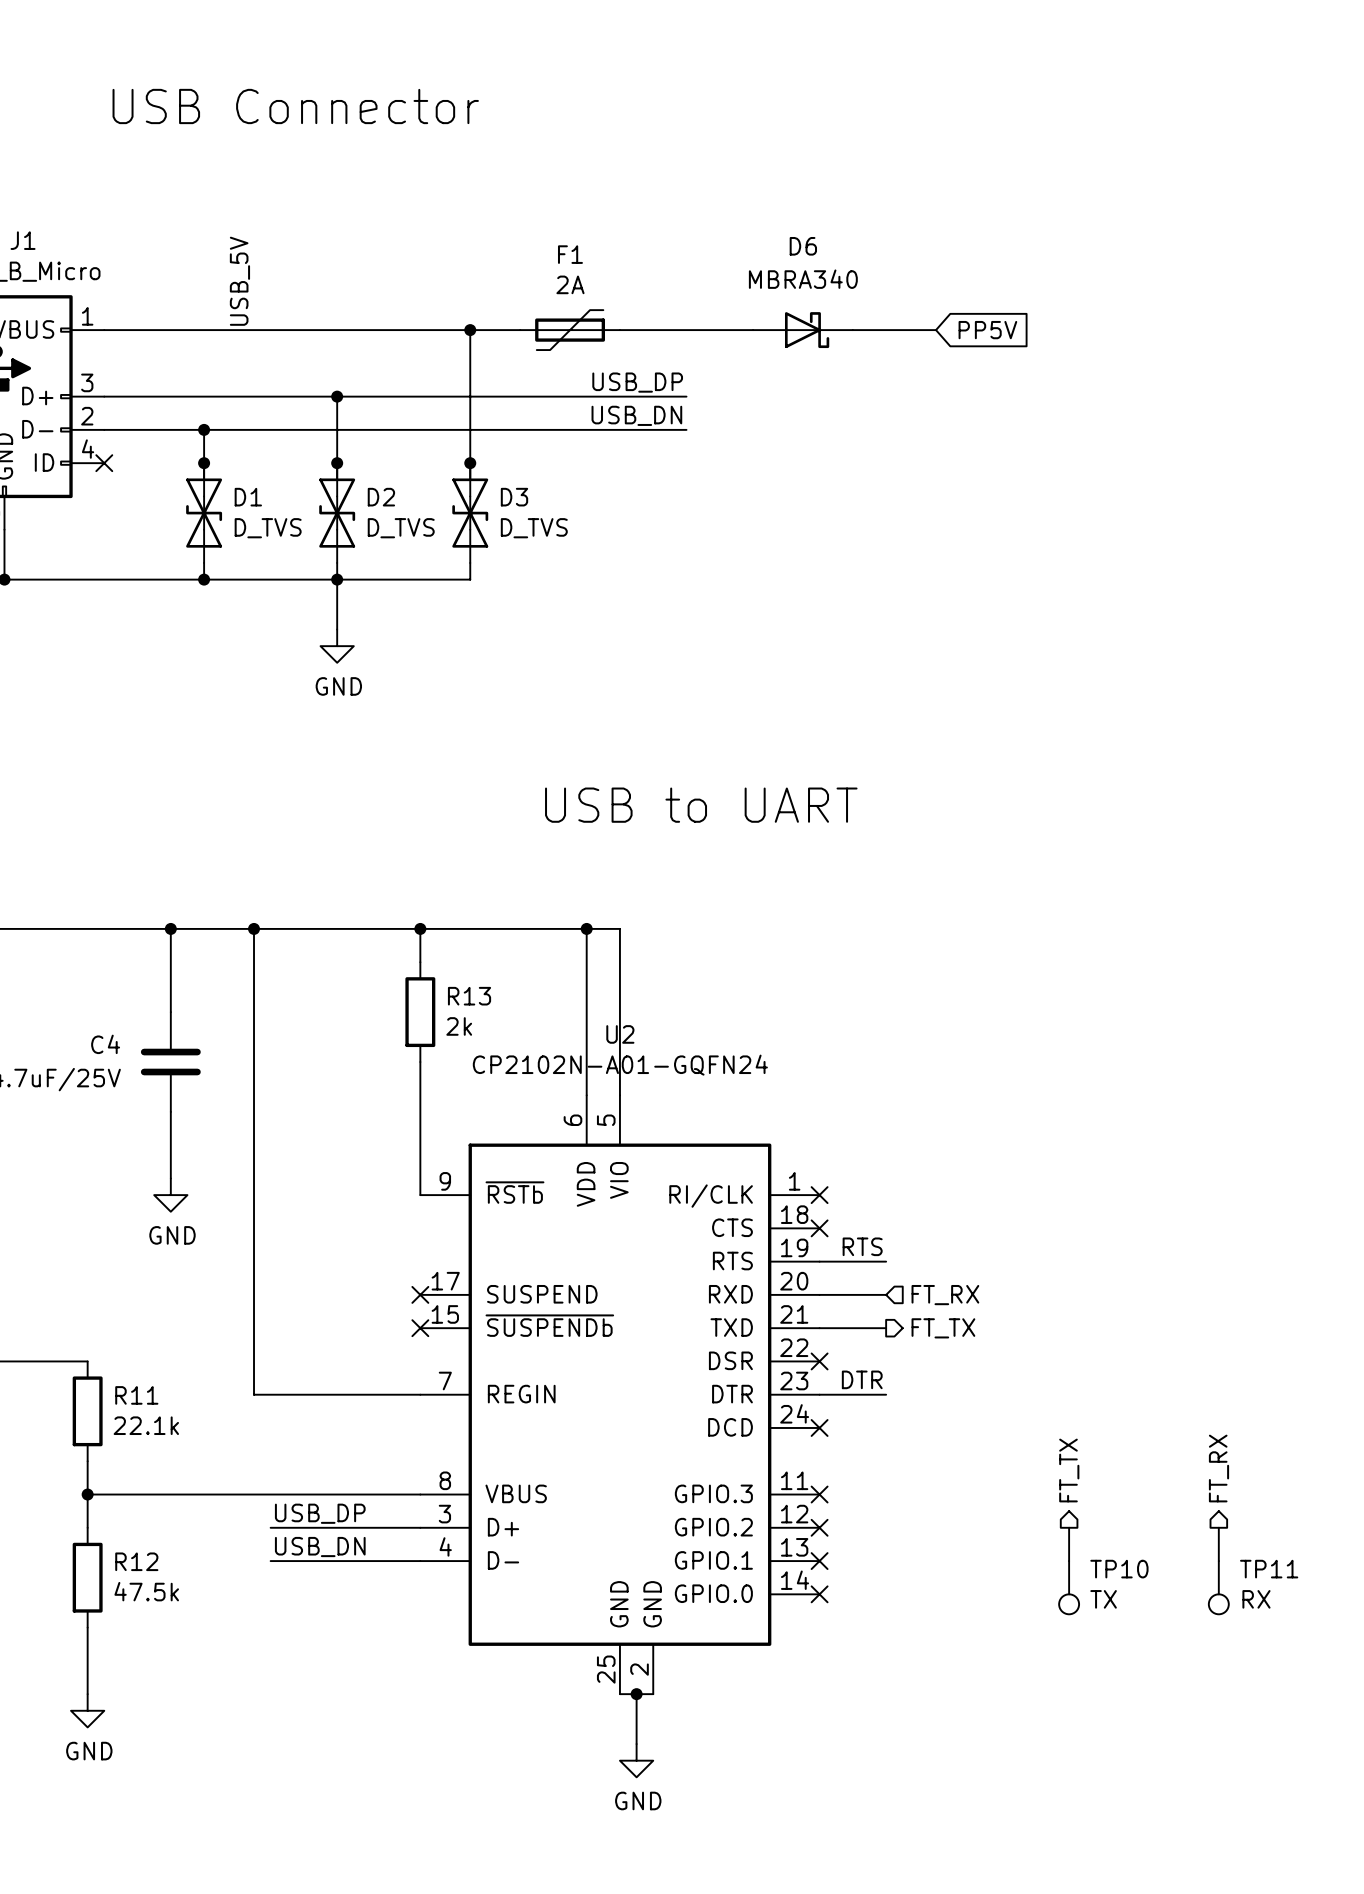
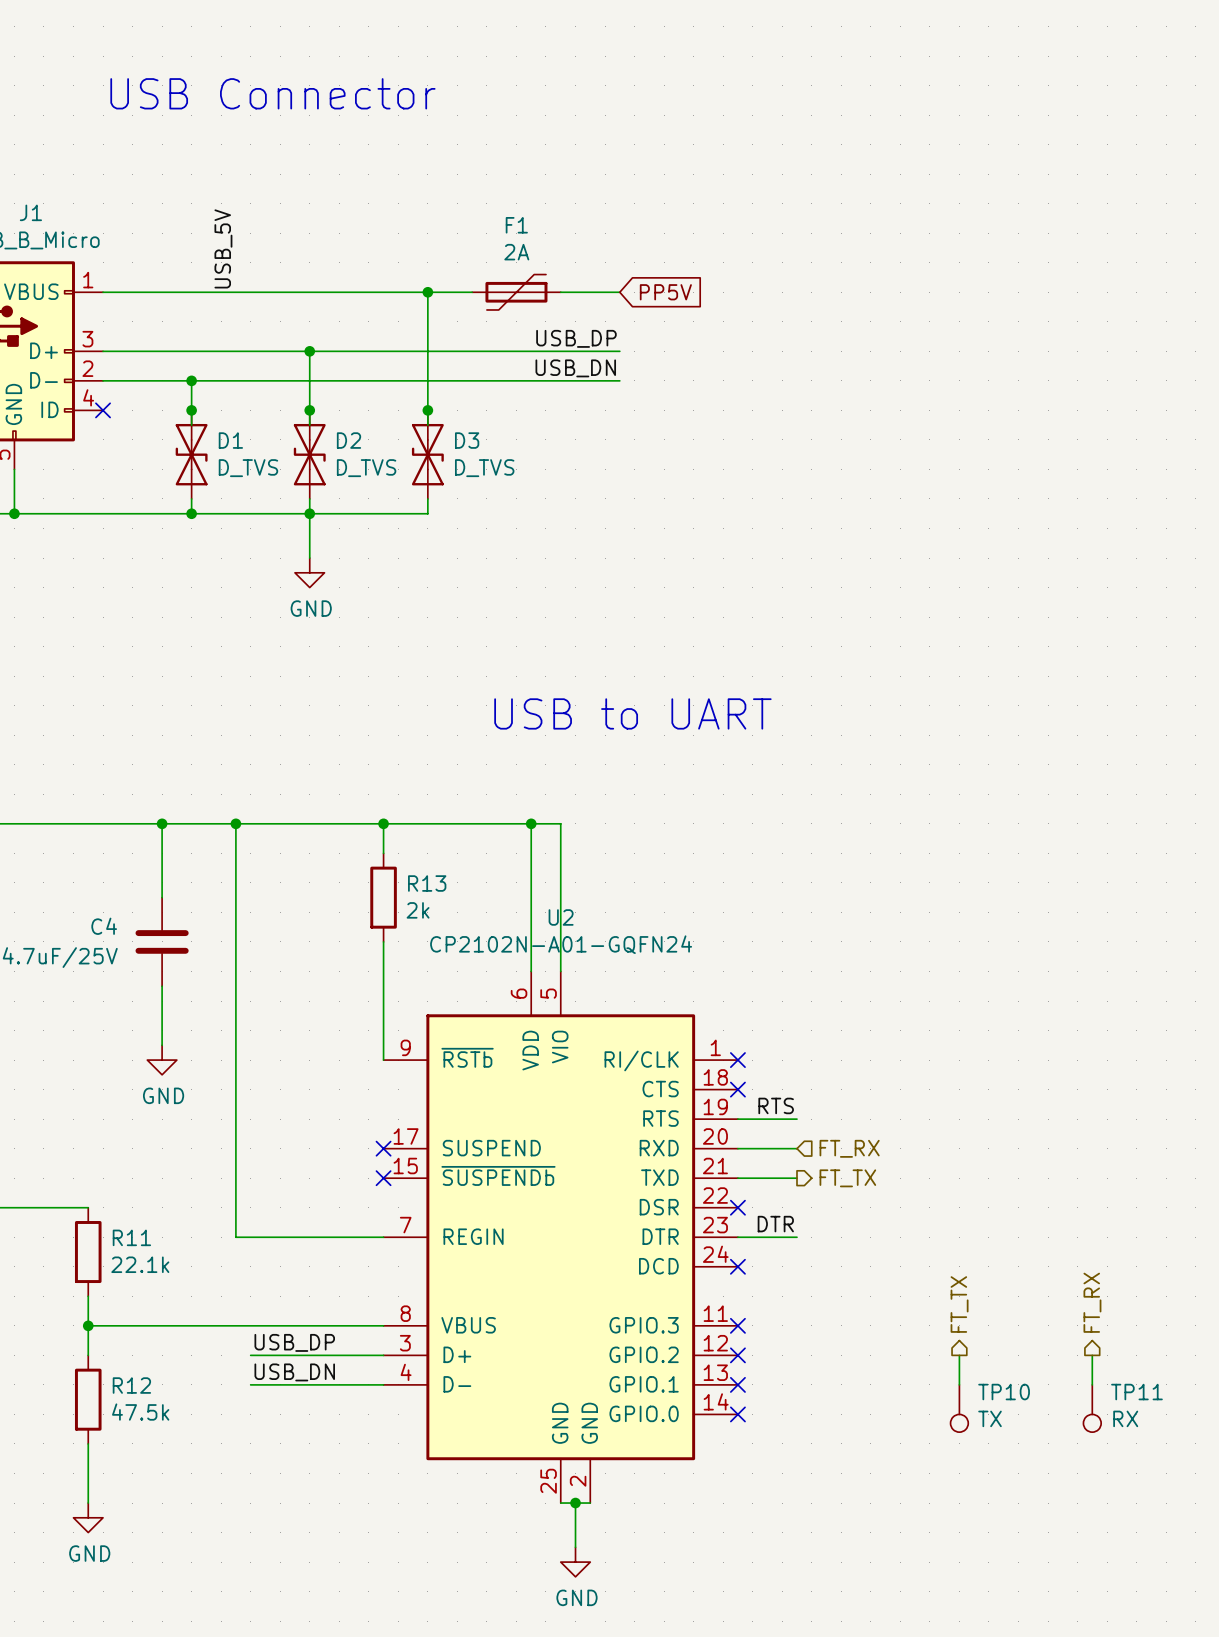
wire: (686, 330) (753, 330) -> none
D6: MBRA340 (802, 330) -> none
wire: (852, 330) (936, 330) -> none
global label position: PP5V (987, 330) -> PP5V (665, 292)

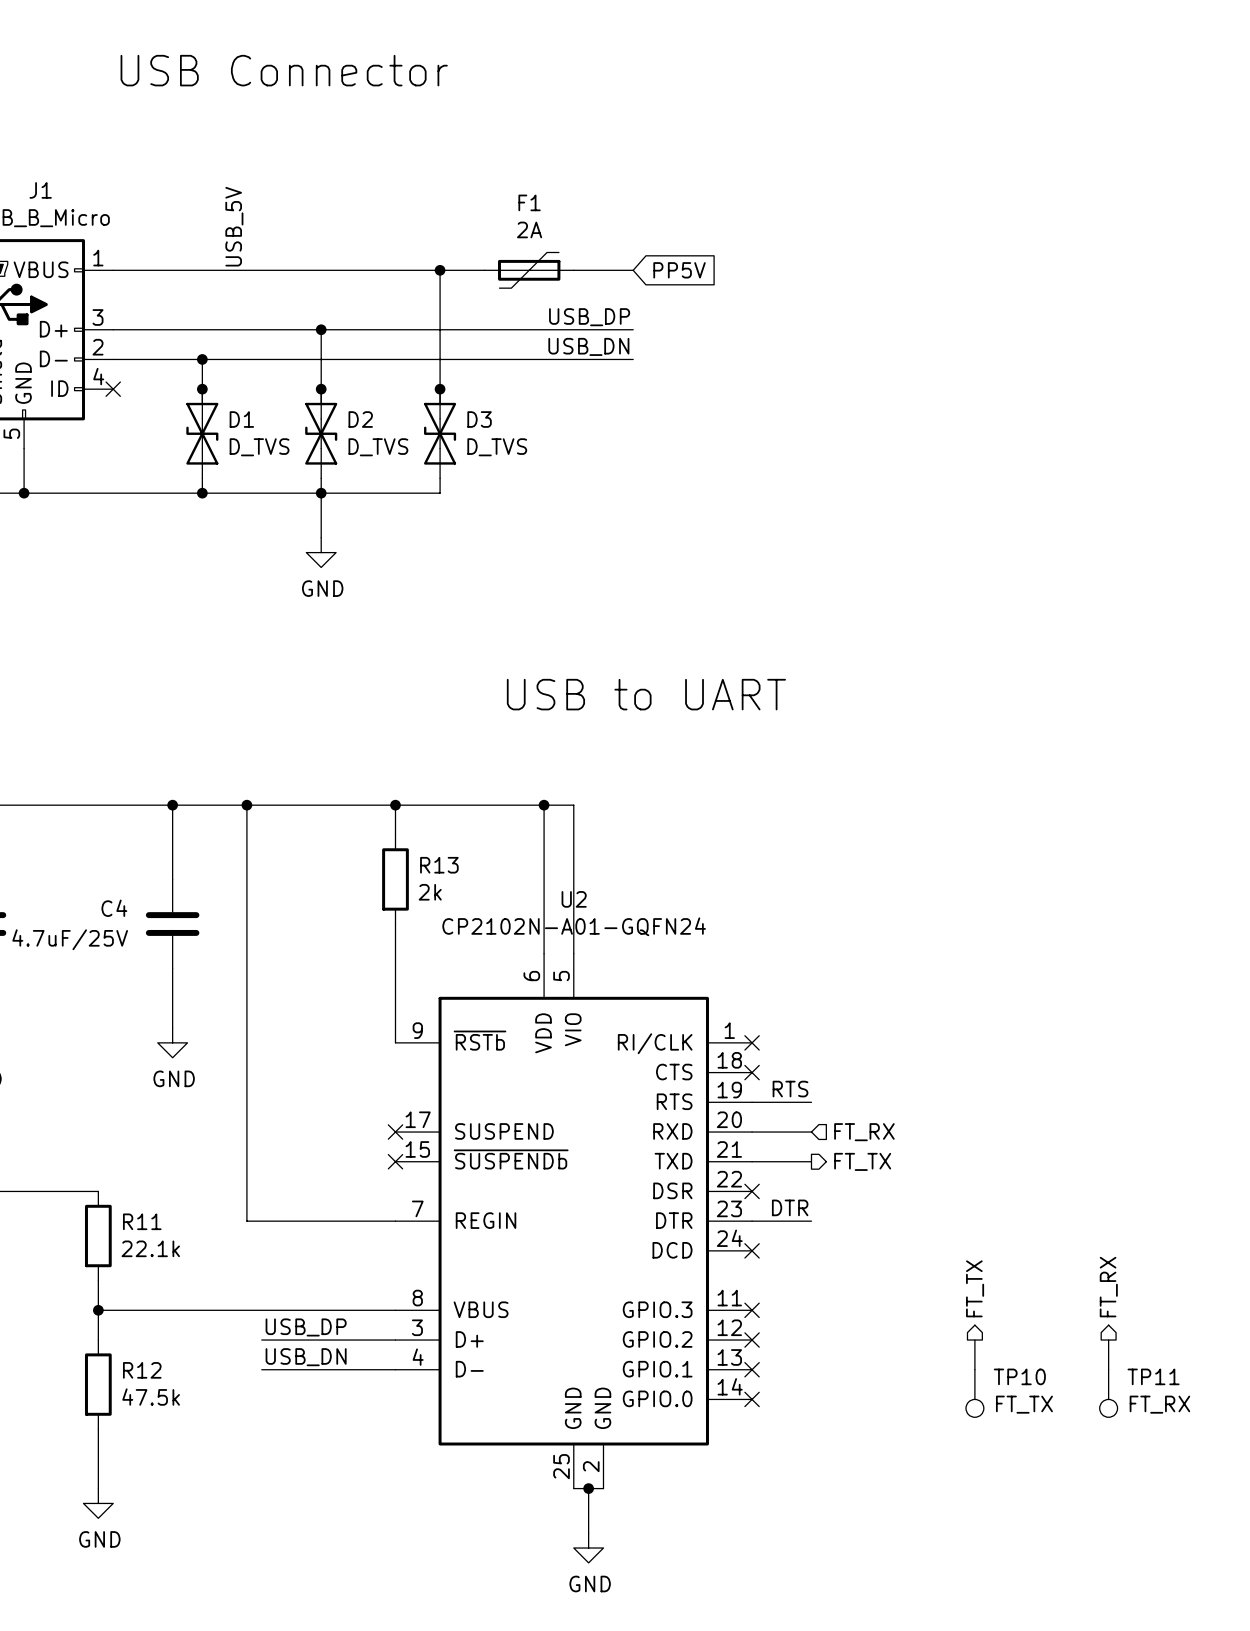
TP10 value: TX (990, 1418) -> FT_TX (1024, 1404)
TP11 value: RX (1125, 1418) -> FT_RX (1159, 1404)

